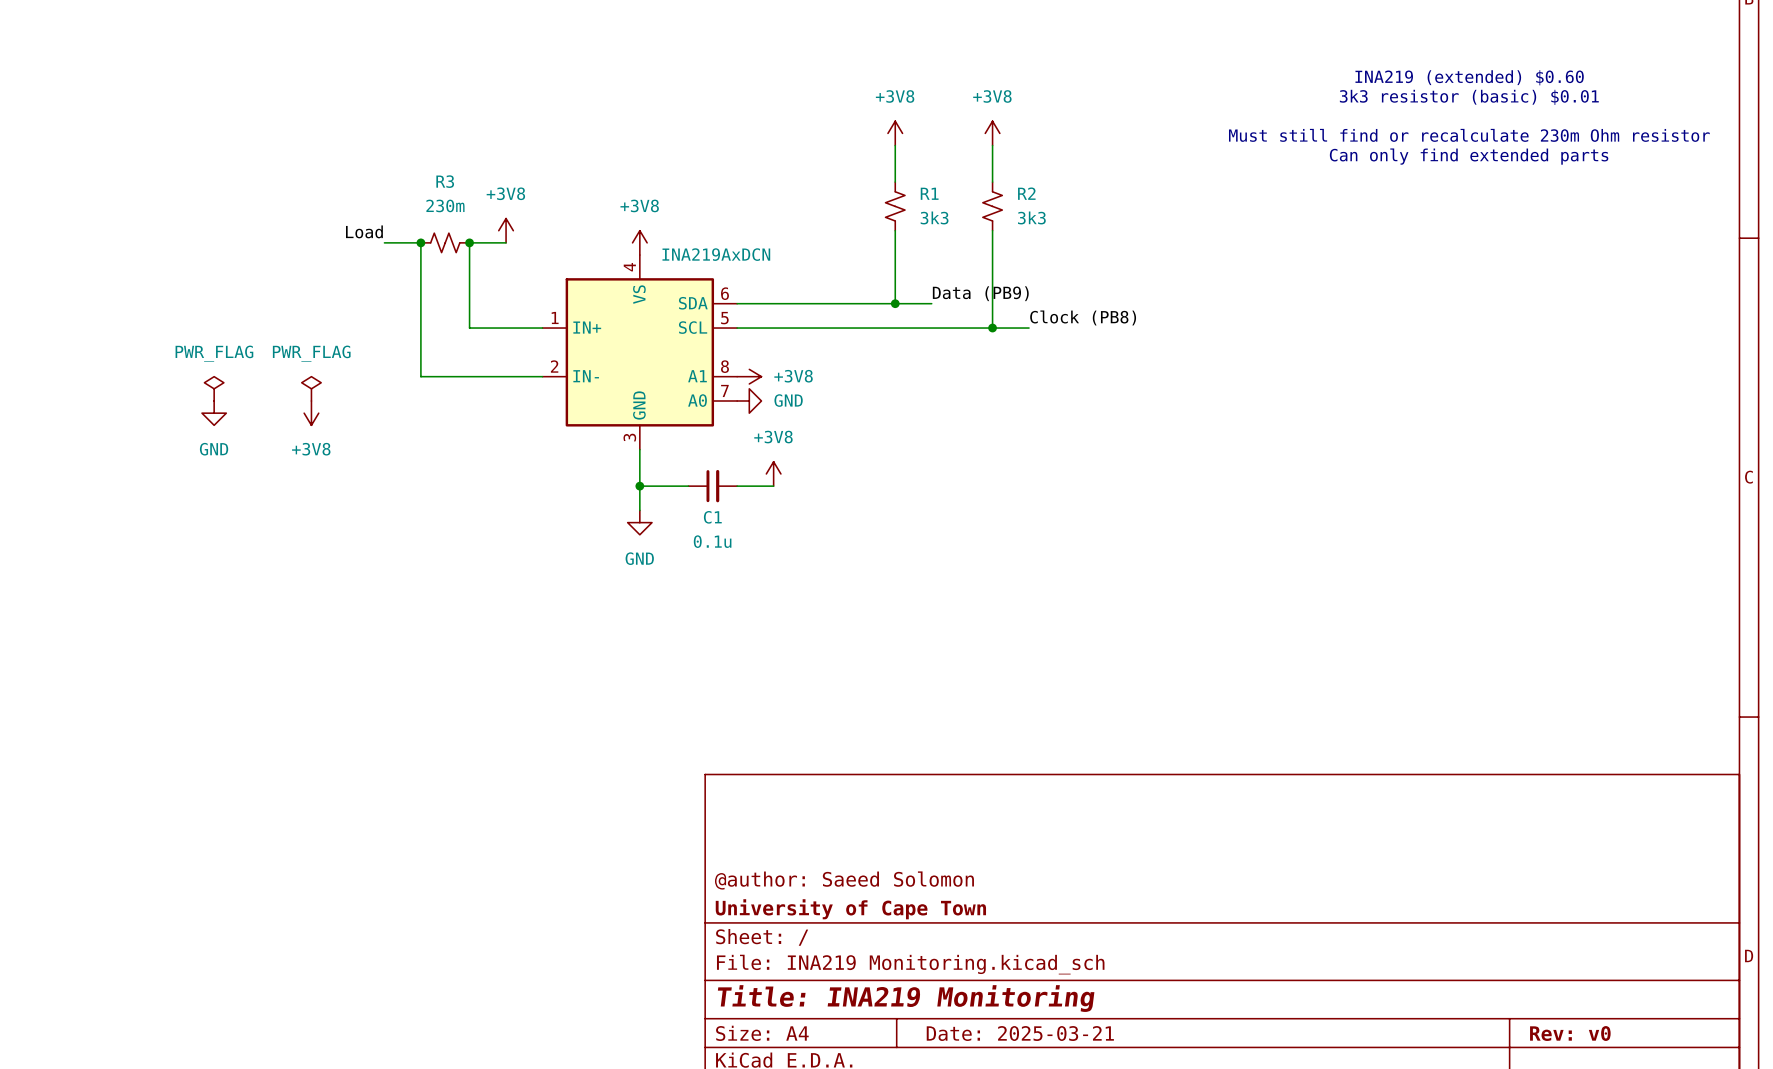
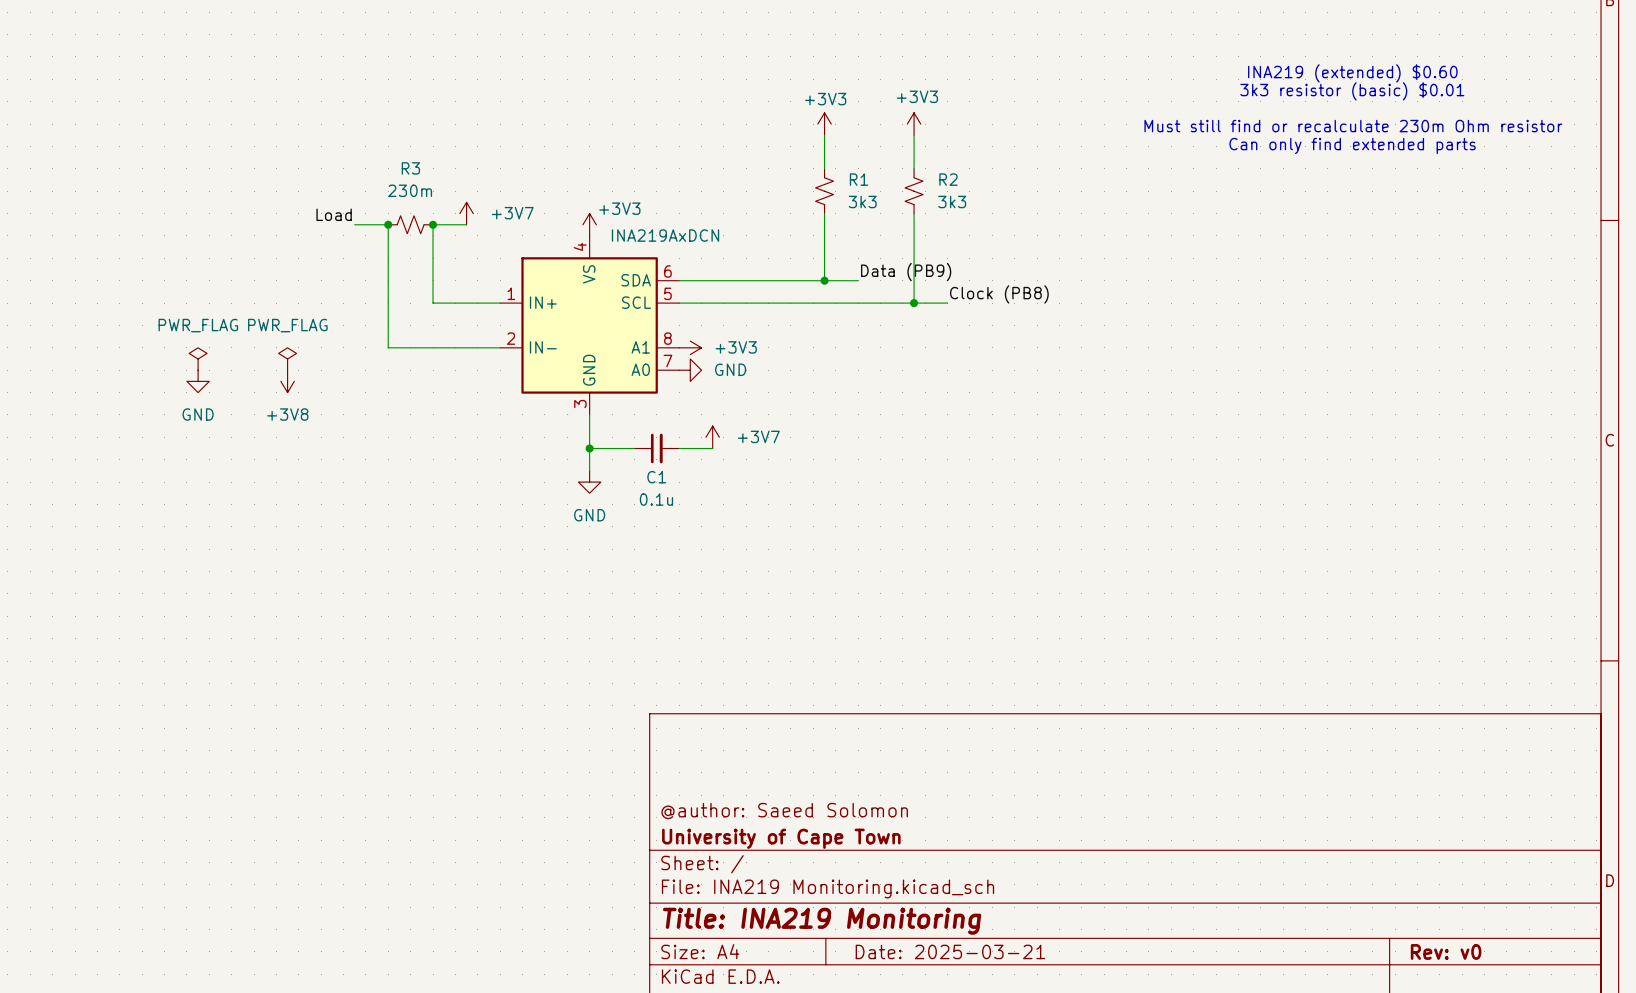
power symbol: +3V8 (895, 133) -> +3V3 (824, 124)
power symbol: +3V8 (992, 133) -> +3V3 (914, 124)
power symbol: +3V8 (506, 230) -> +3V7 (466, 213)
power symbol: +3V8 (639, 242) -> +3V3 (589, 224)
power symbol: +3V8 (749, 376) -> +3V3 (690, 347)
power symbol: +3V8 (773, 473) -> +3V7 (712, 437)

